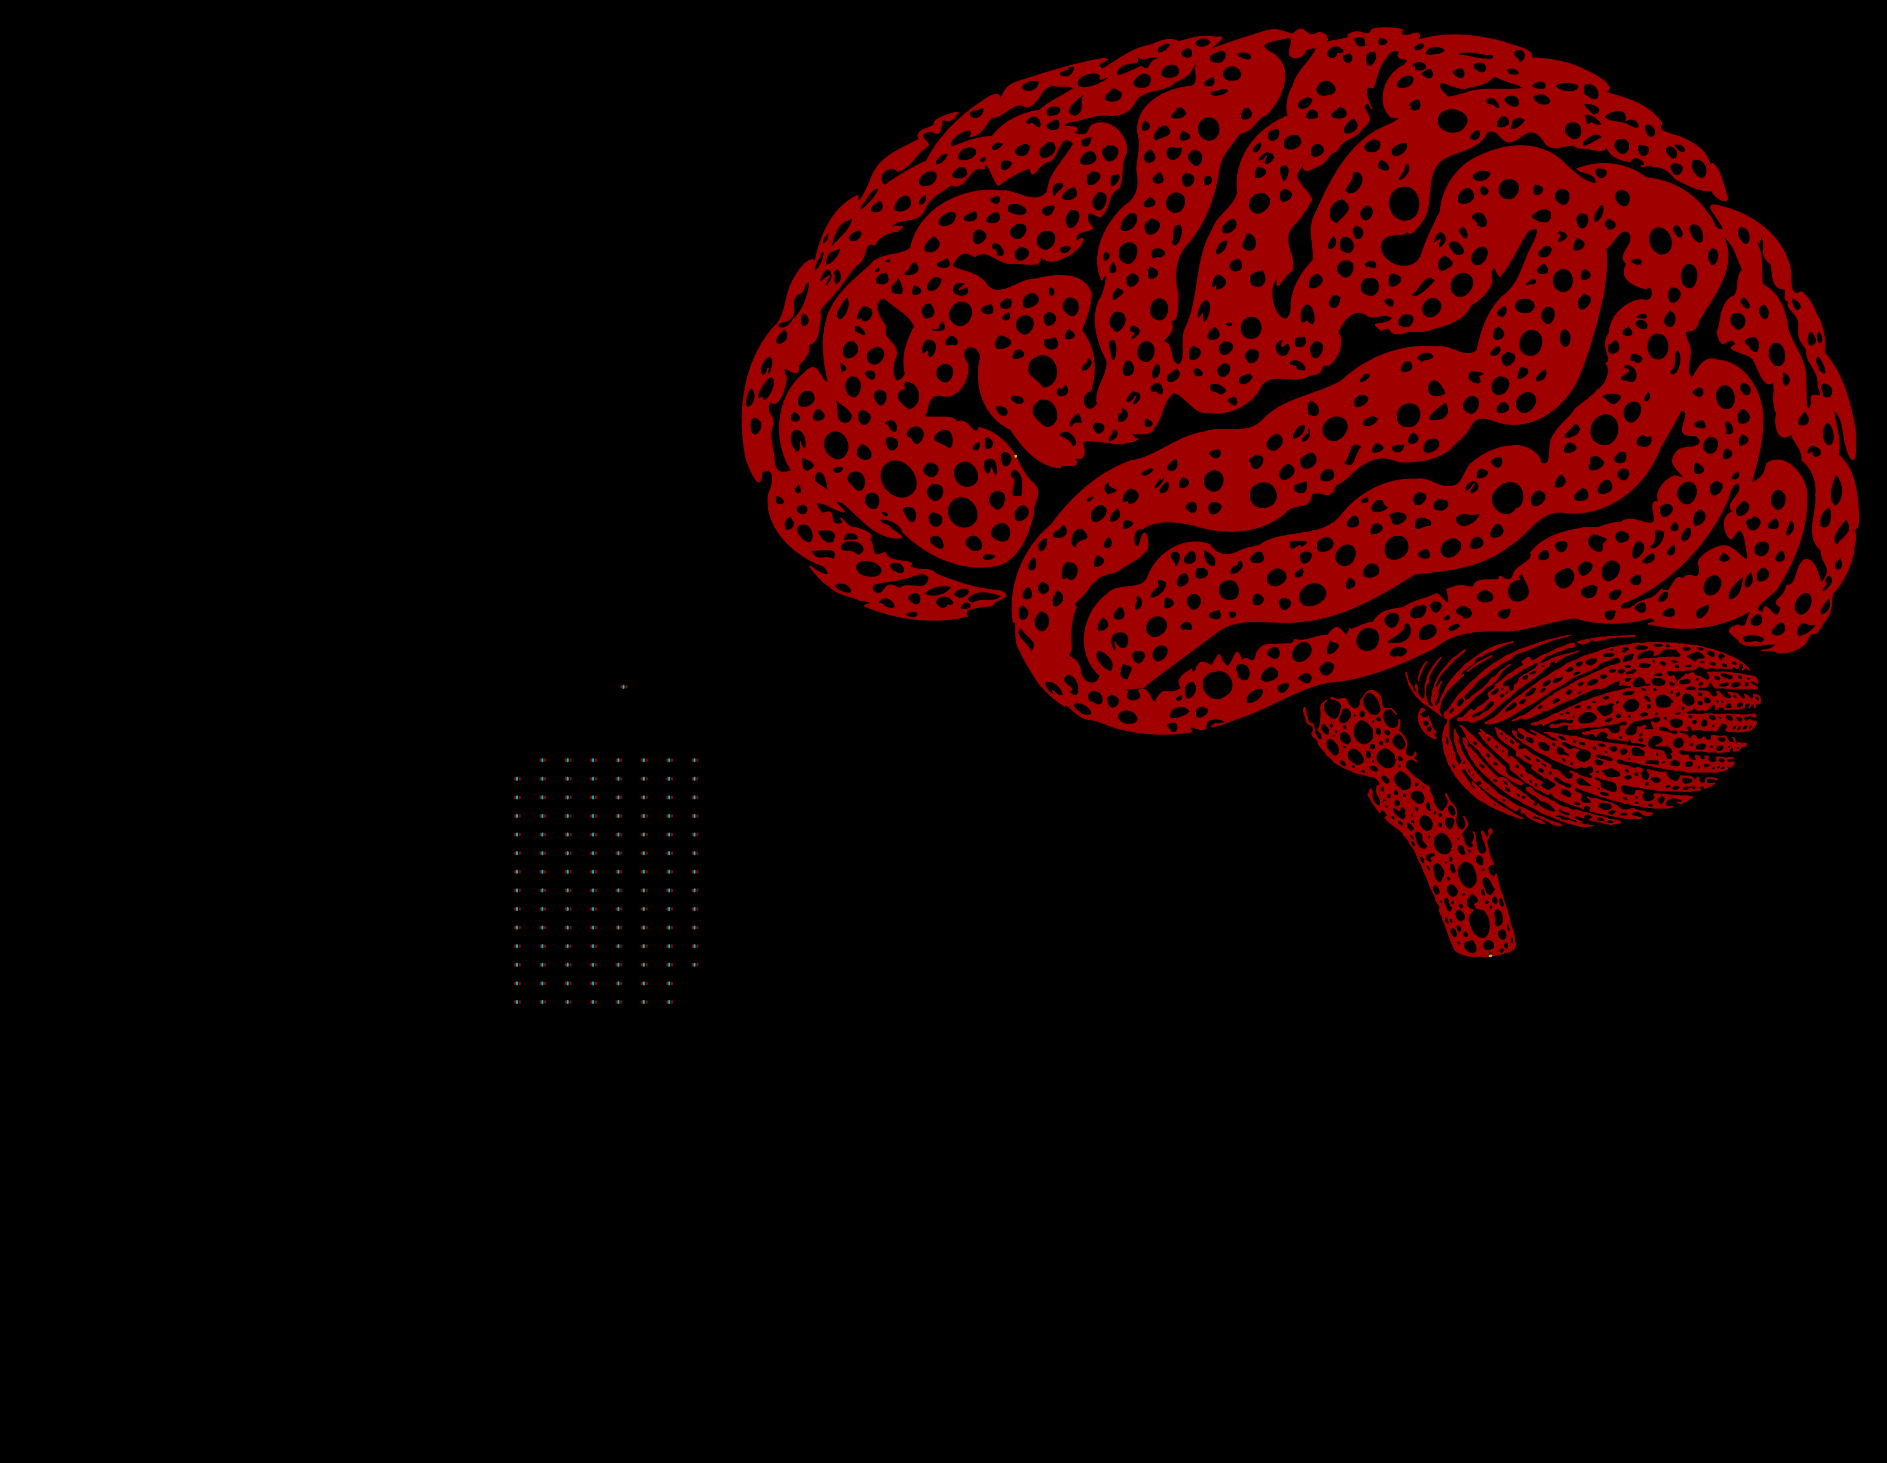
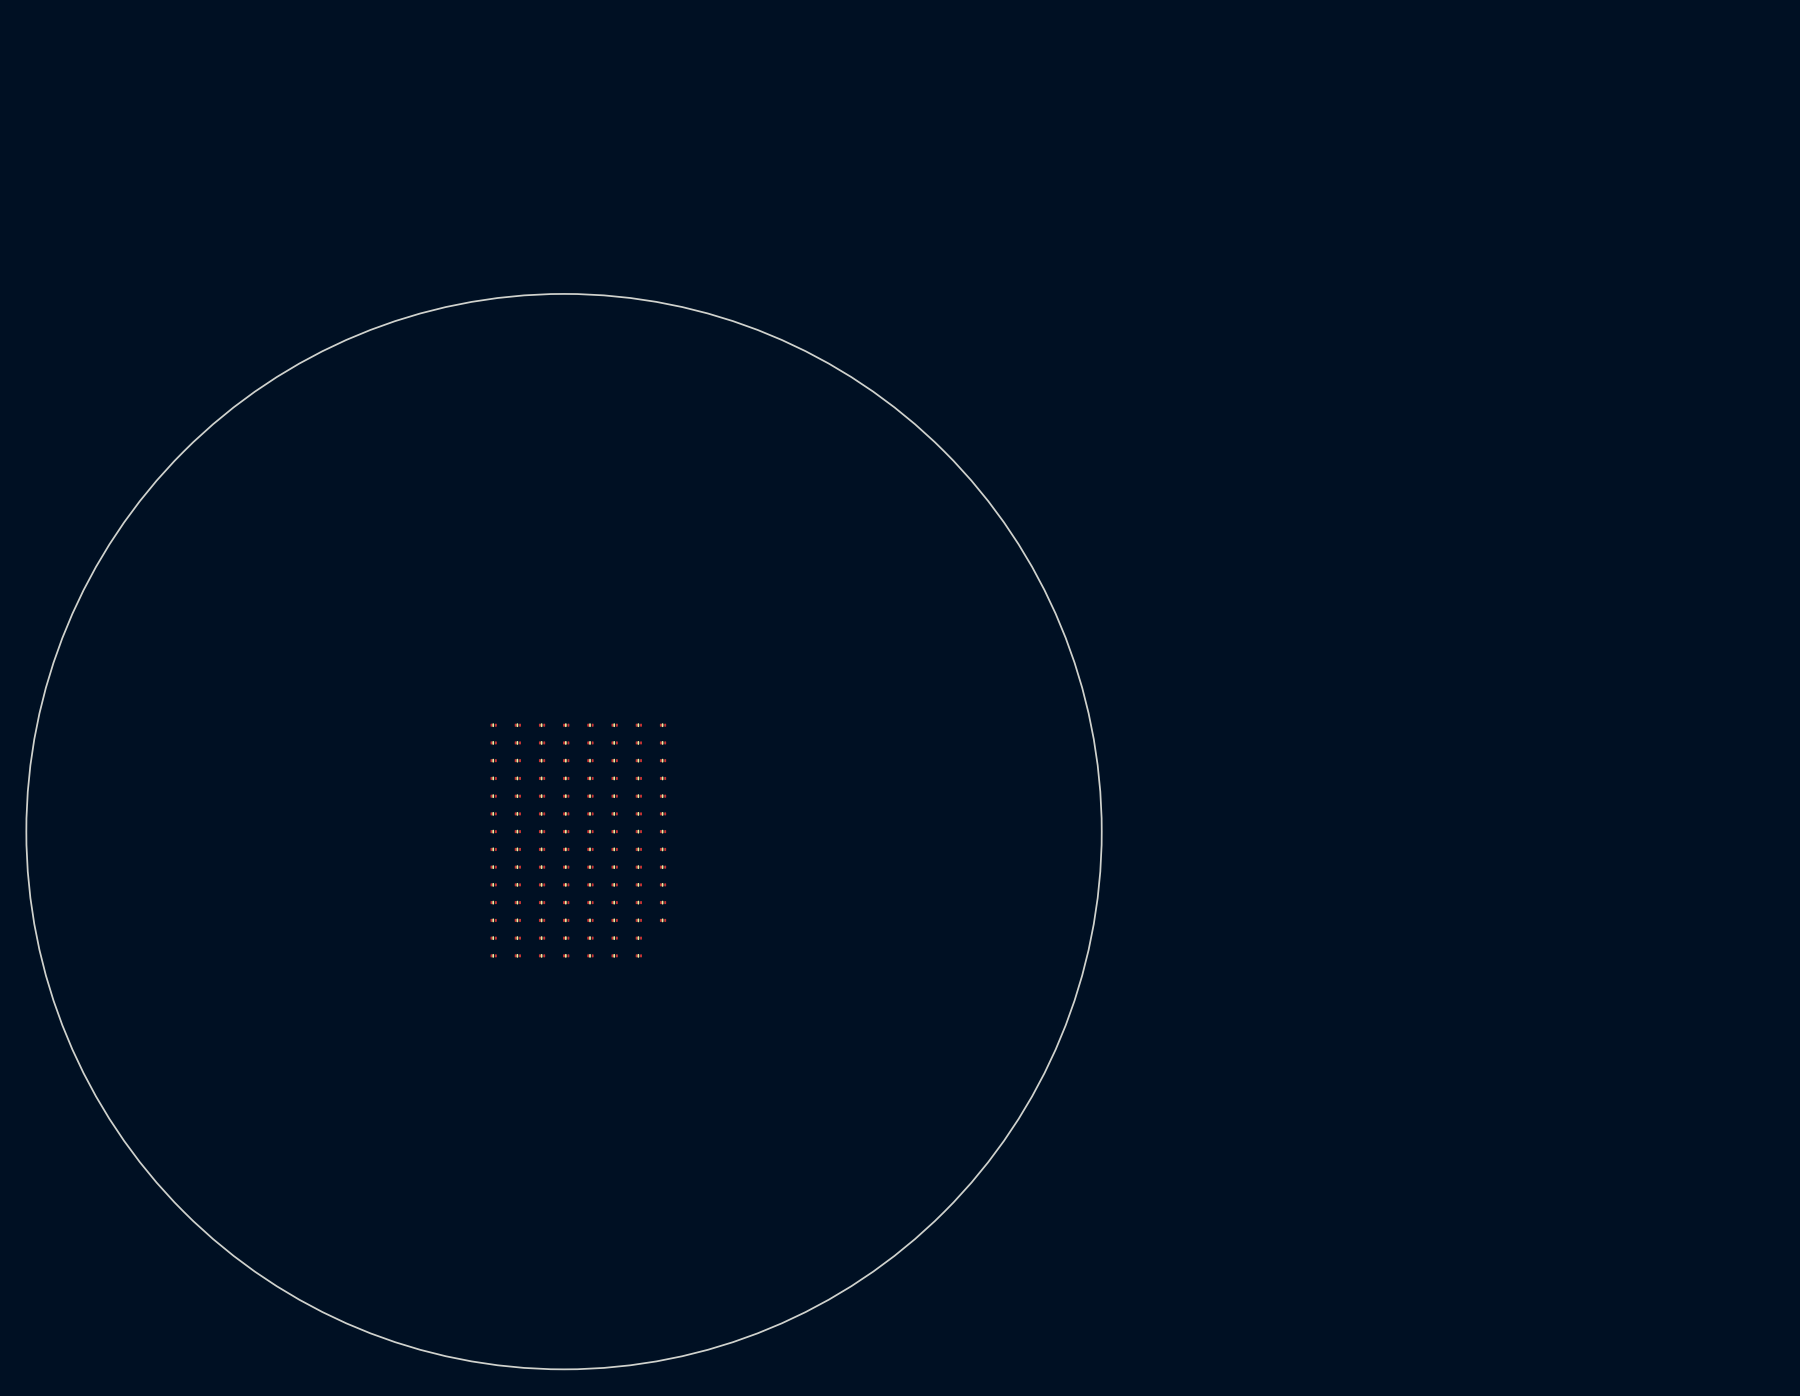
drawing: [741, 27, 1860, 958] -> none
round board edge: none -> [26, 293, 1103, 1370]
board edge: (1015, 455) (1015, 456) (1015, 456) (1015, 455) -> none
part position: (624, 686) -> (493, 725)
board edge: (1491, 955) (1491, 955) -> none

